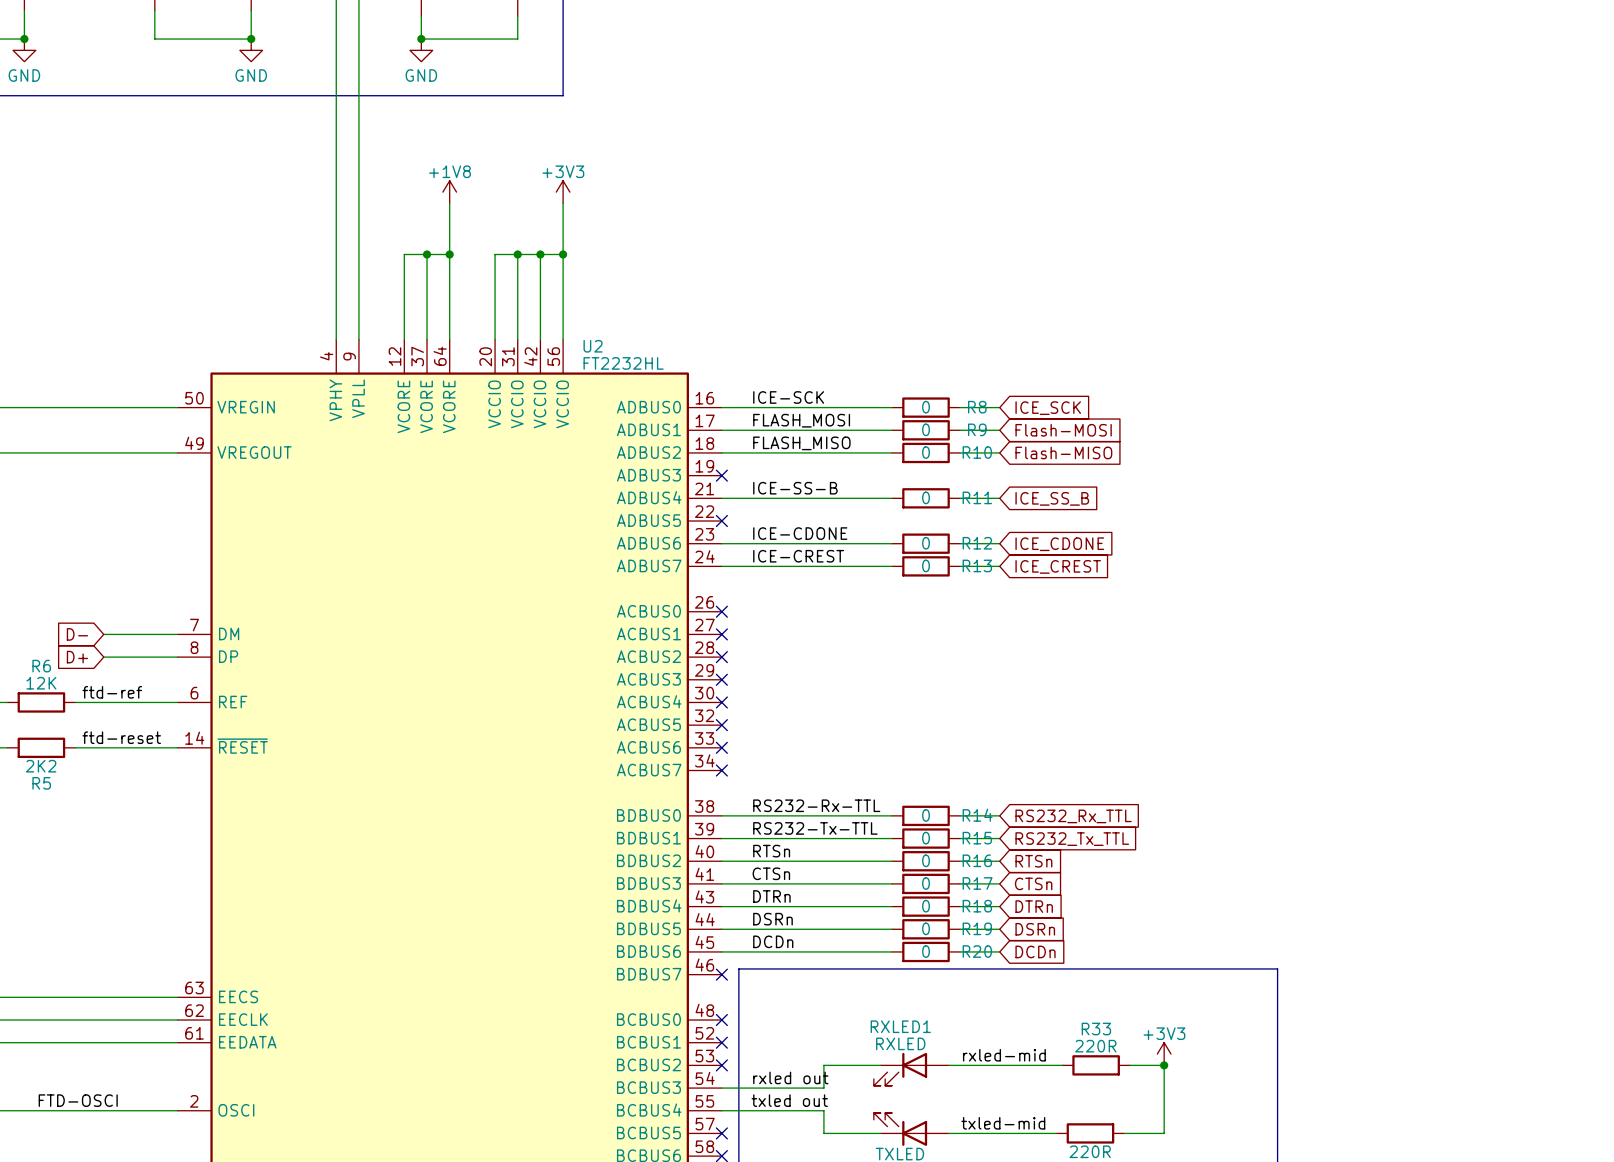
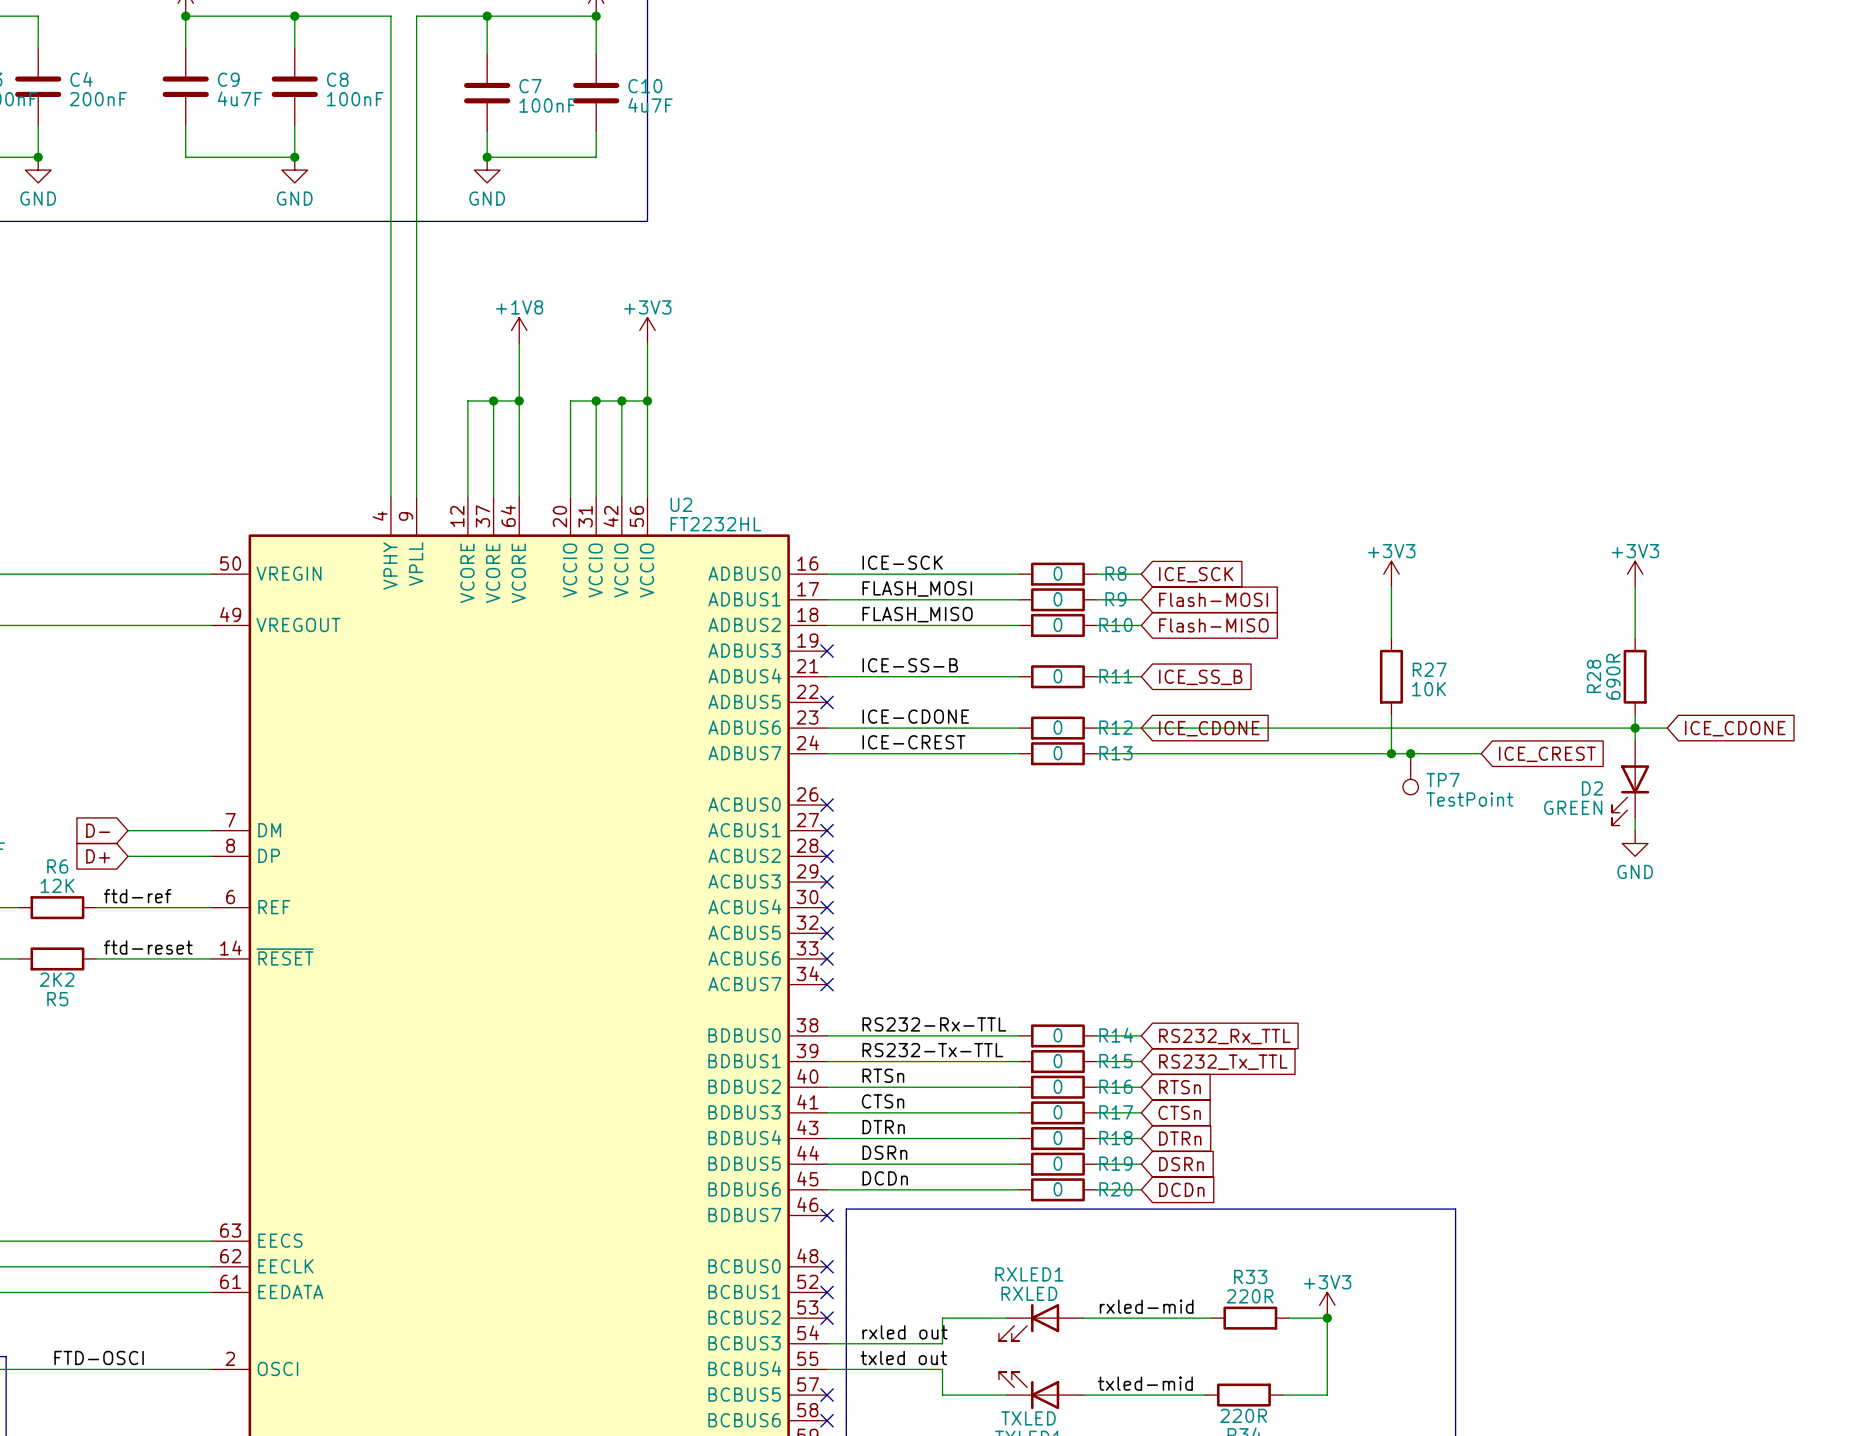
power symbol: none -> +3V3 (1391, 574)
power symbol: none -> +3V3 (1635, 574)
wire: none -> (1391, 586) (1391, 638)
wire: none -> (1635, 586) (1635, 638)
R27: none -> 10K (1391, 676)
R28: none -> 690R (1635, 676)
wire: none -> (1391, 715) (1391, 753)
wire: none -> (1635, 715) (1635, 740)
wire: none -> (1141, 728) (1667, 728)
junction: none -> (1635, 728)
global label: none -> ICE_CDONE (1735, 728)
wire: none -> (1141, 753) (1481, 753)
global label: ICE_CREST (1058, 566) -> none
junction: none -> (1391, 753)
junction: none -> (1410, 753)
global label: none -> ICE_CREST (1547, 754)
TP7: none -> TestPoint (1410, 774)
D2: none -> GREEN (1630, 783)
wire: none -> (1635, 817) (1635, 830)
power symbol: none -> GND (1635, 843)

